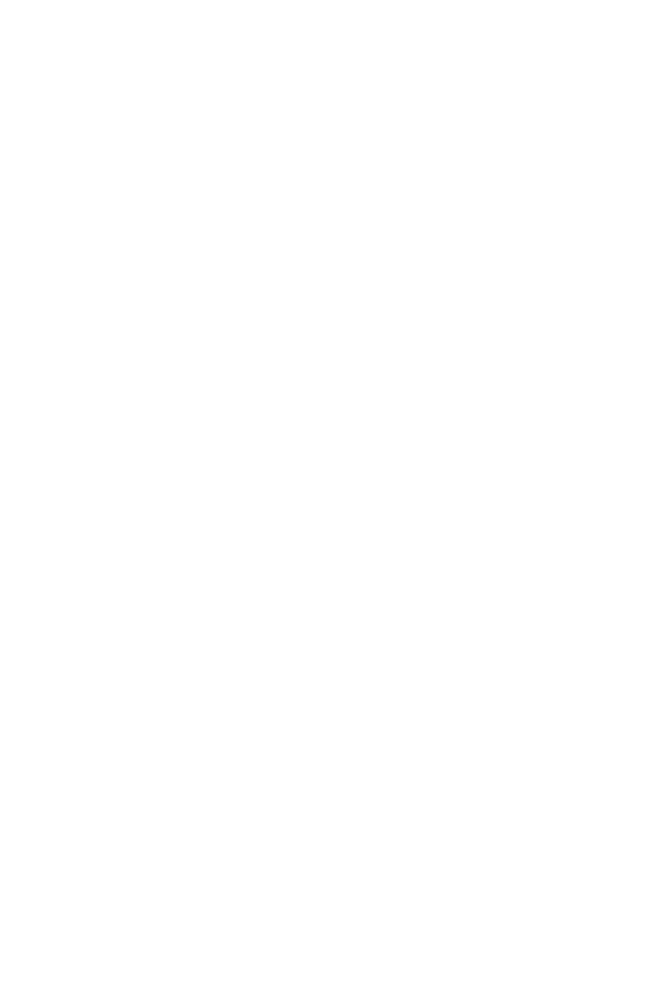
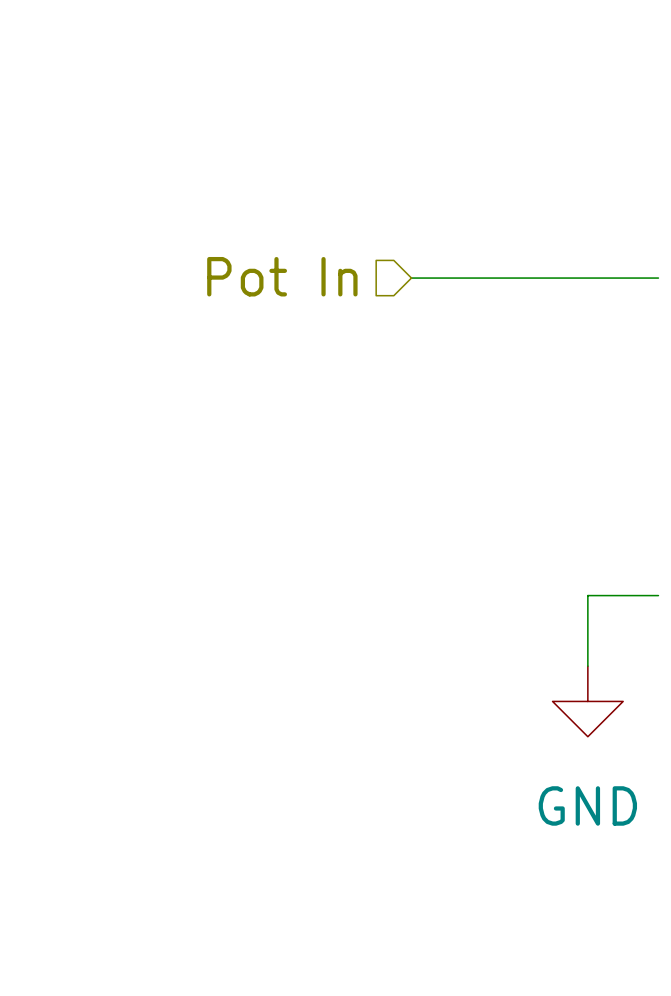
hierarchical label: none -> Pot In (282, 276)
wire: none -> (411, 278) (658, 278)
wire: none -> (658, 595) (587, 595) (587, 666)
power symbol: none -> GND (587, 701)

